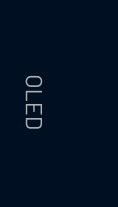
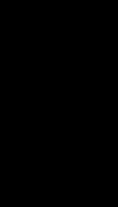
text: OLED (33, 102) -> none

